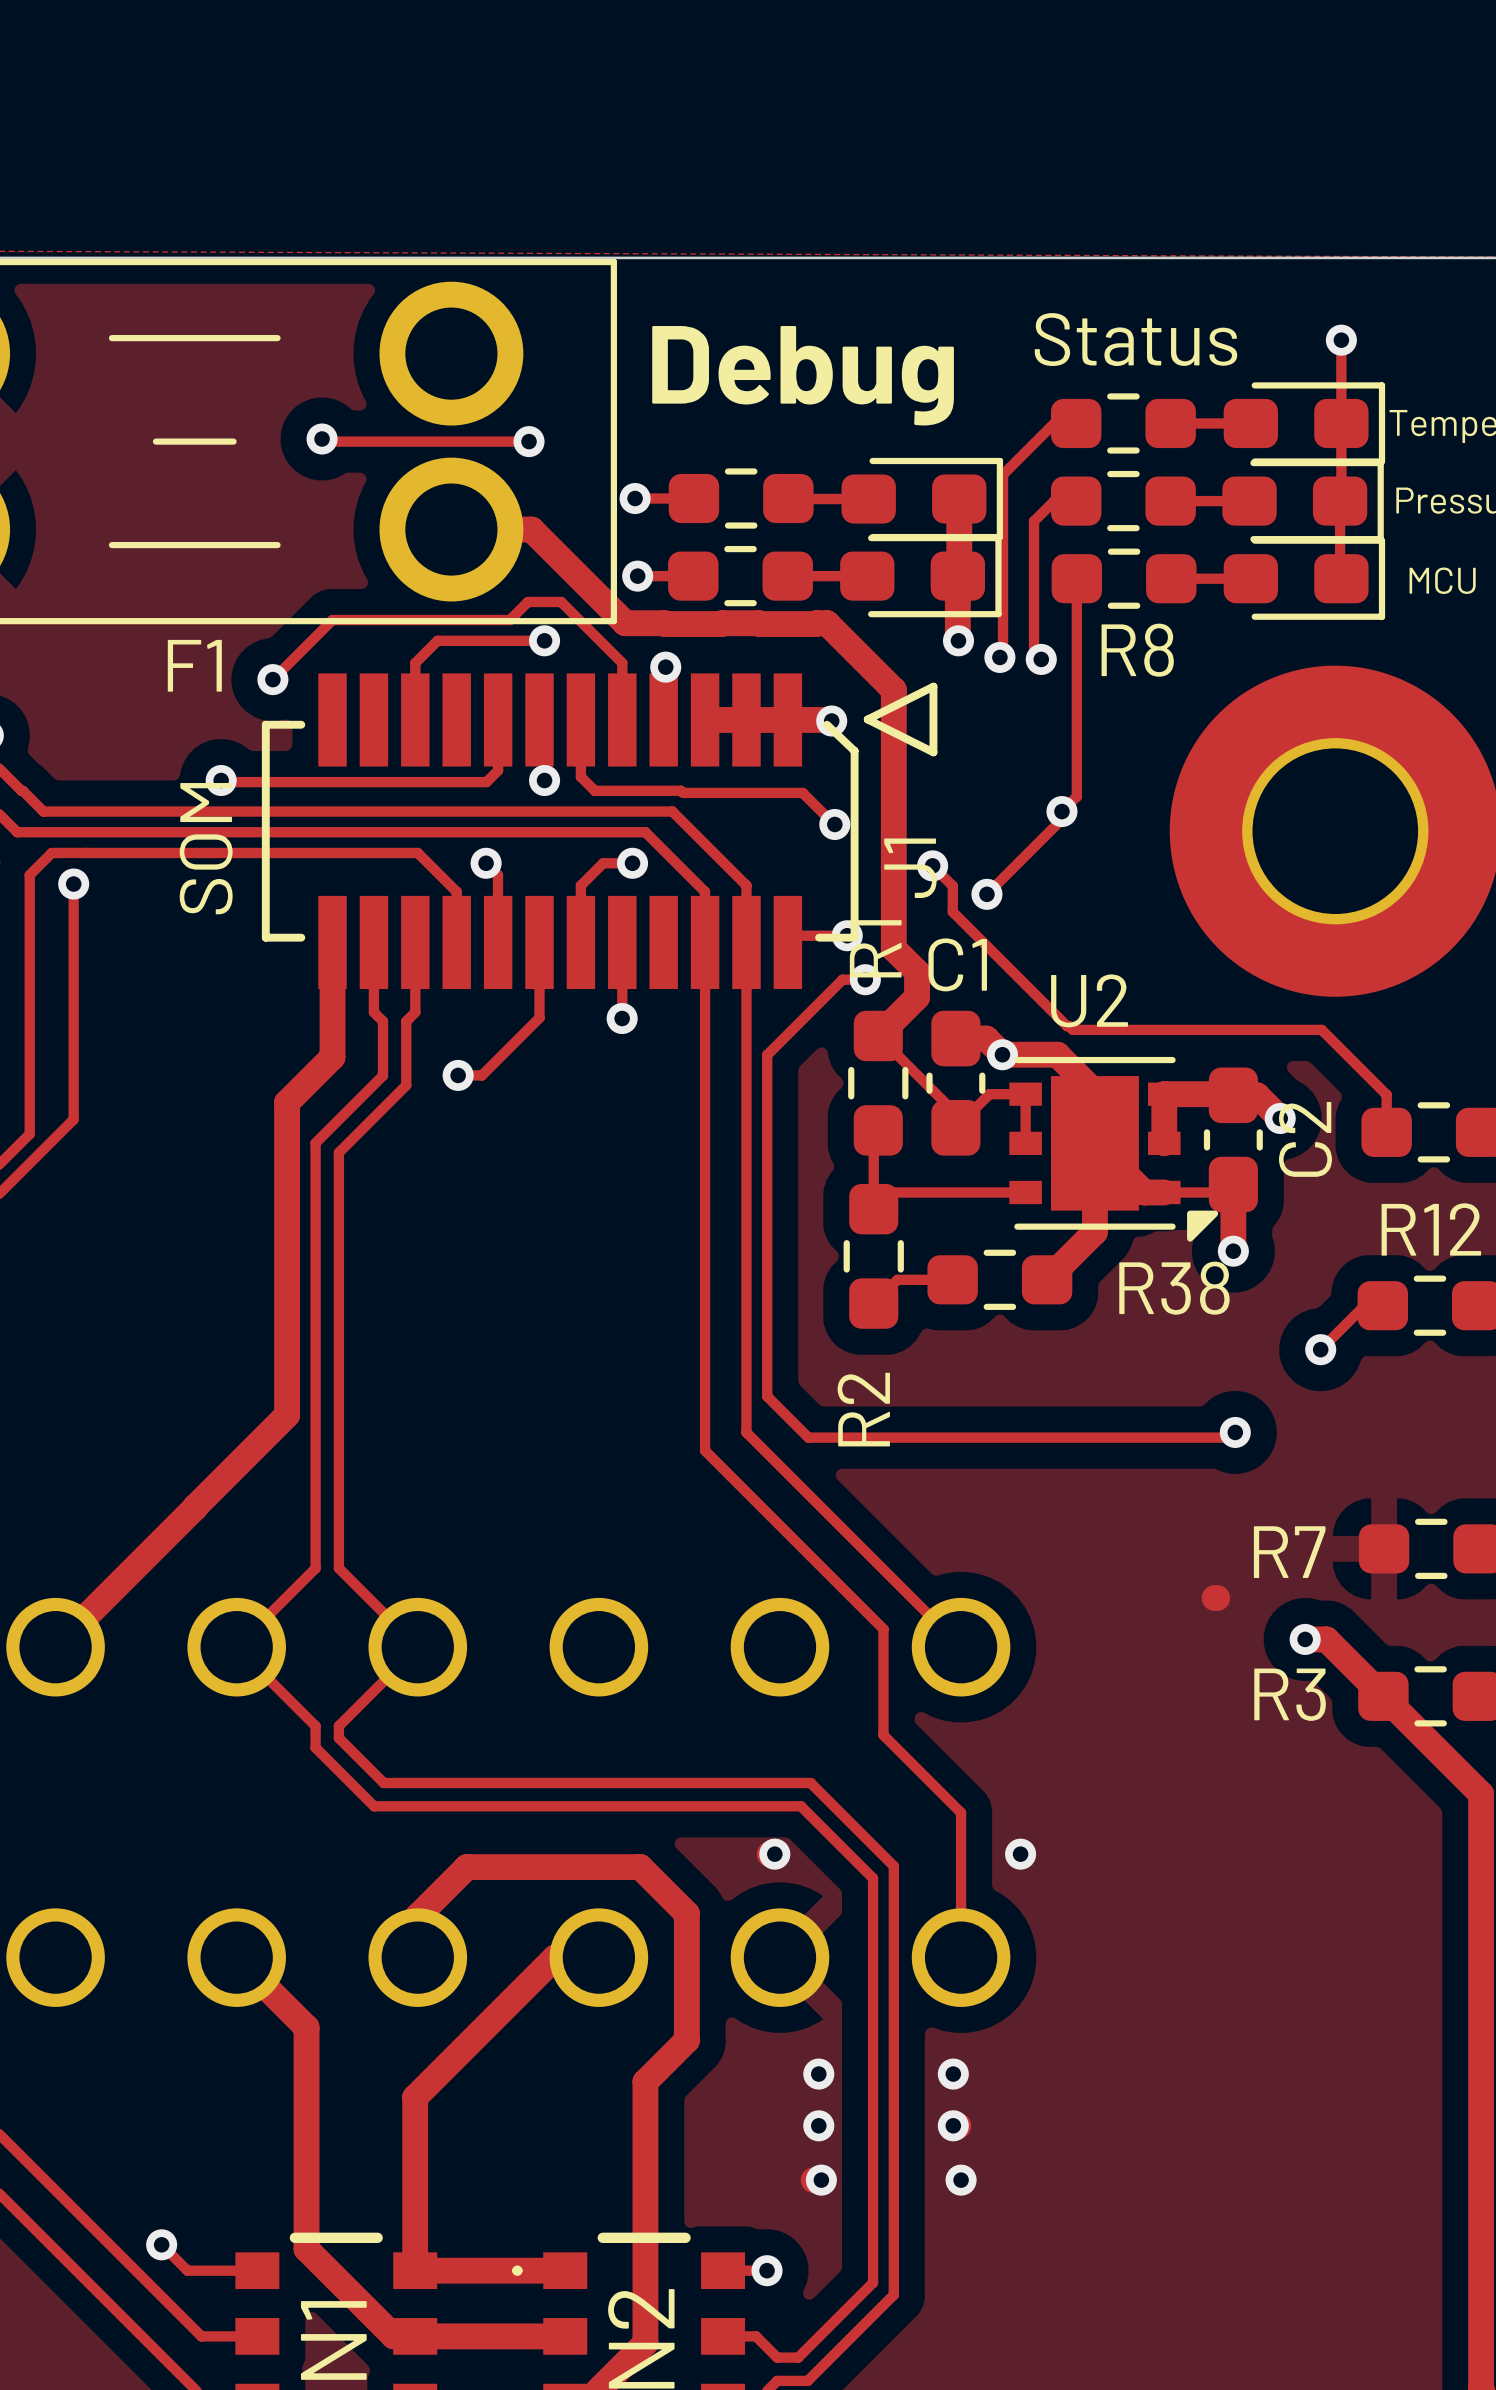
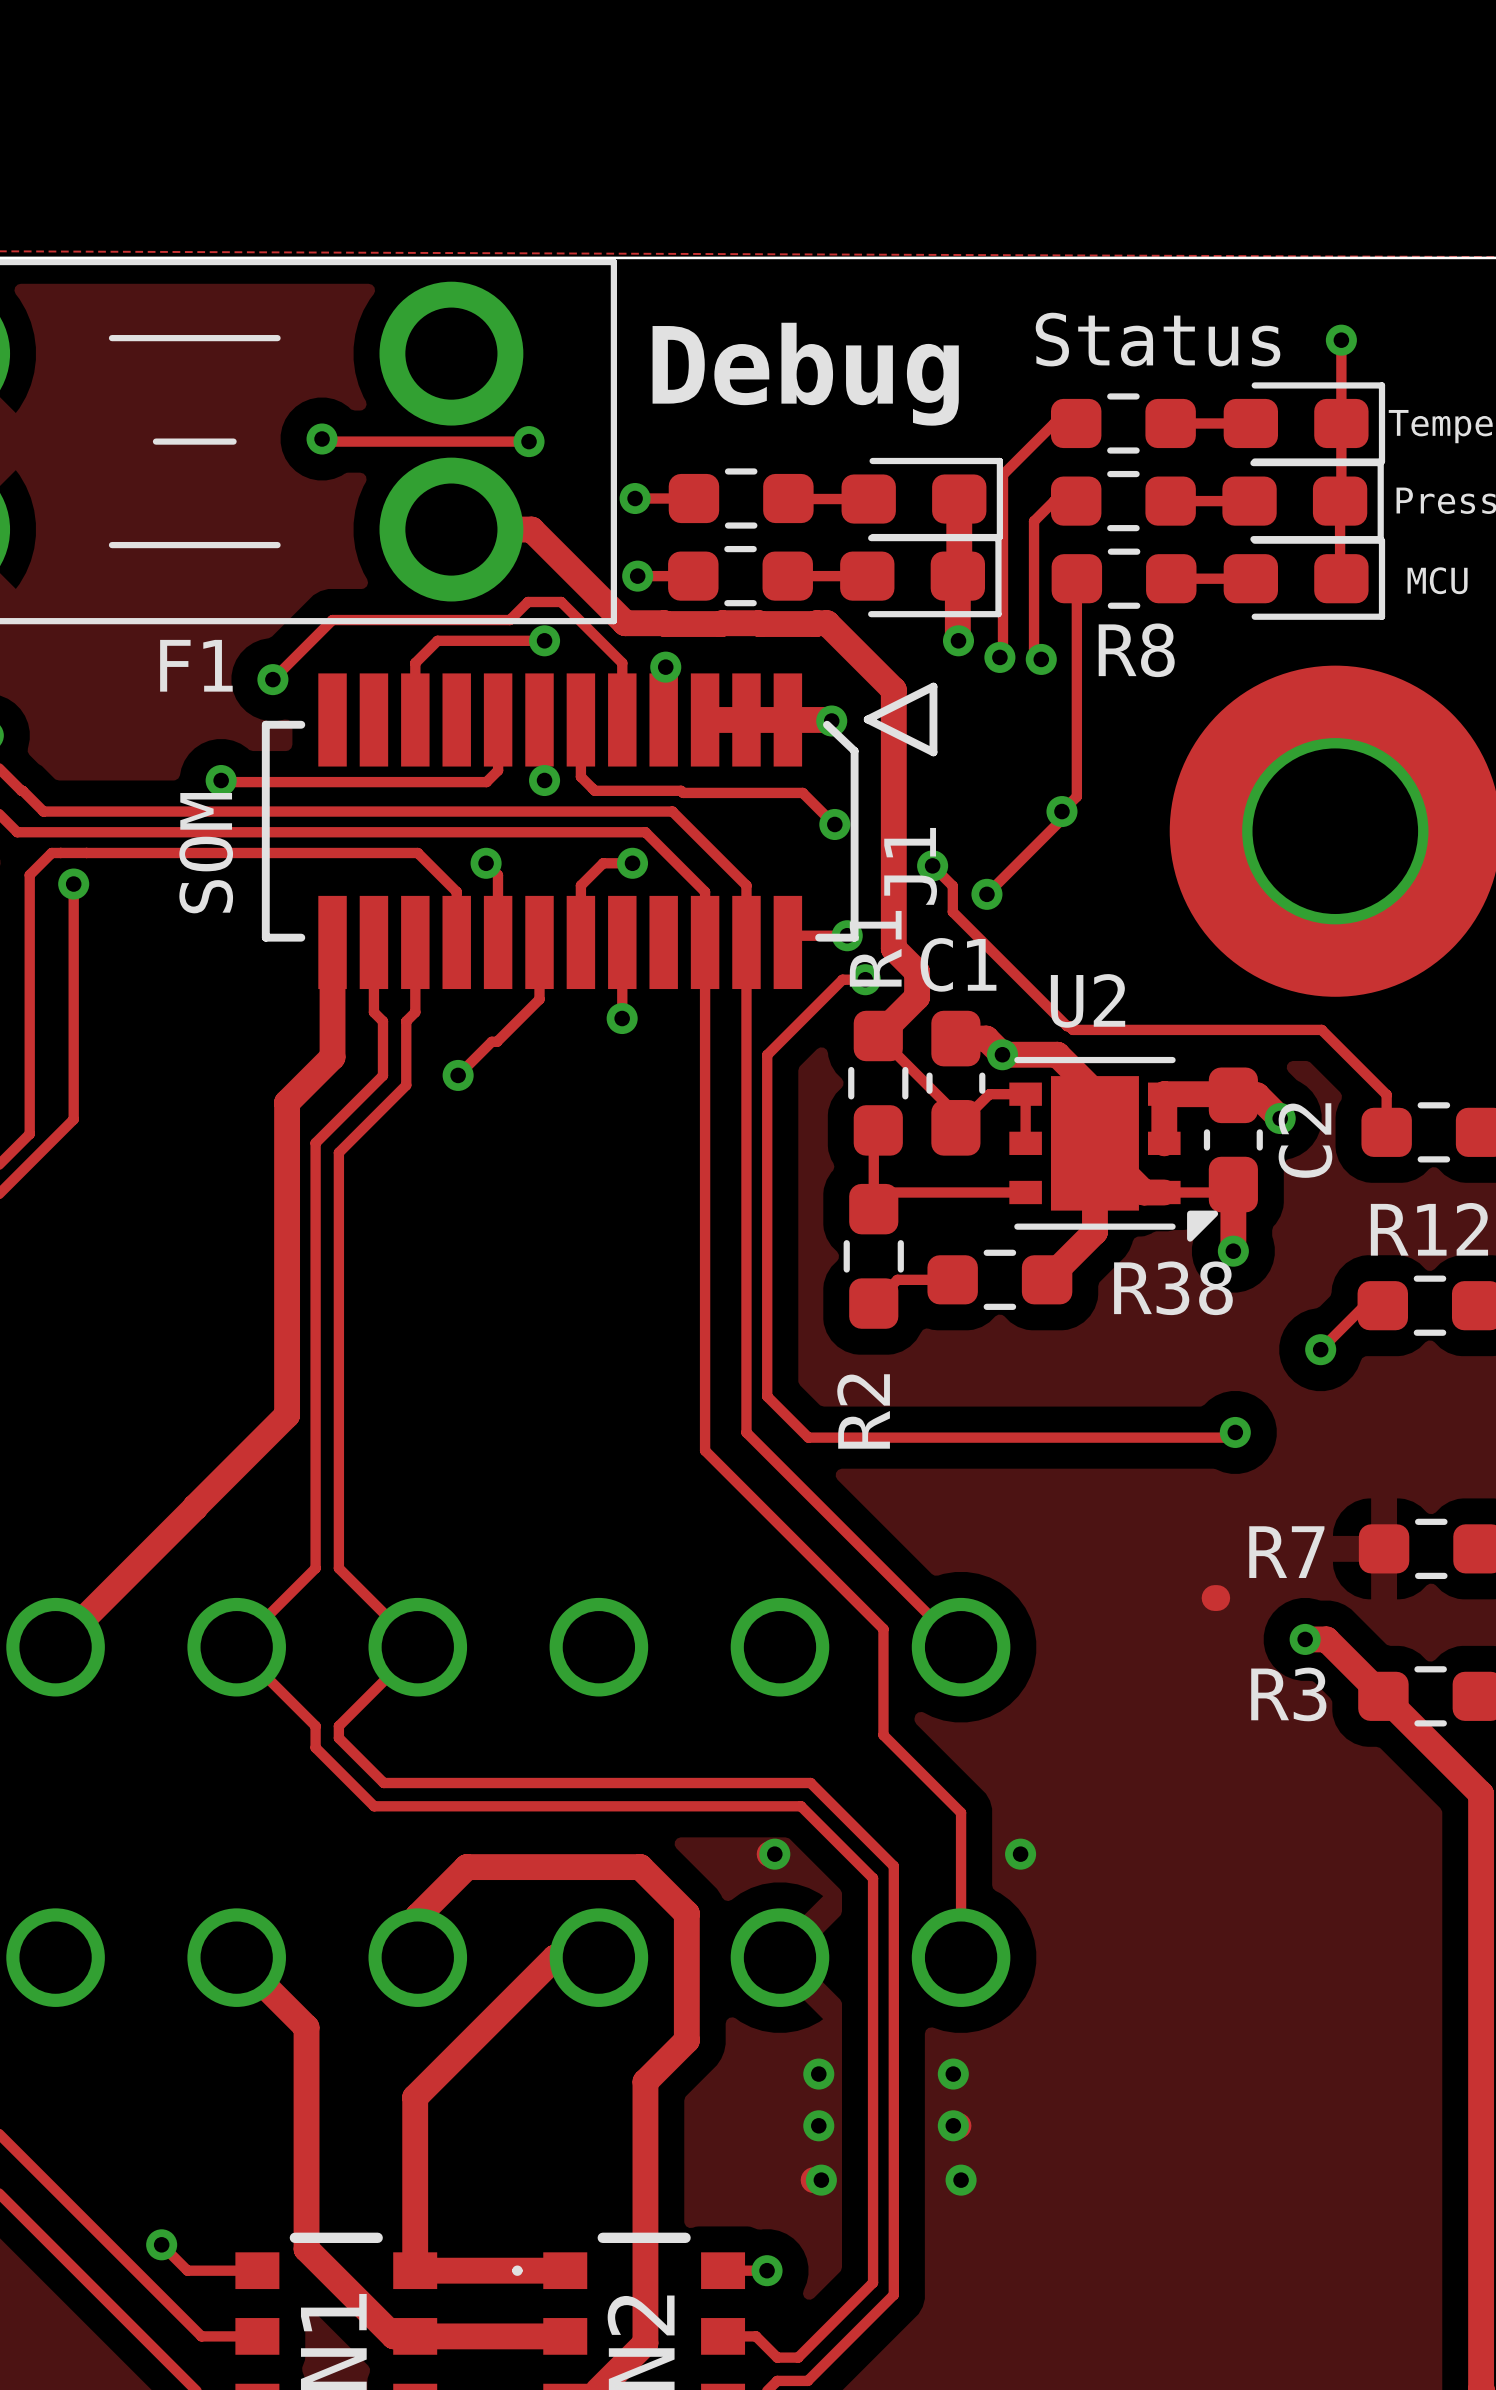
track: (539, 999) (539, 1017) (481, 1075) (458, 1075) -> (539, 999) (497, 1041) (491, 1041) (458, 1075)

